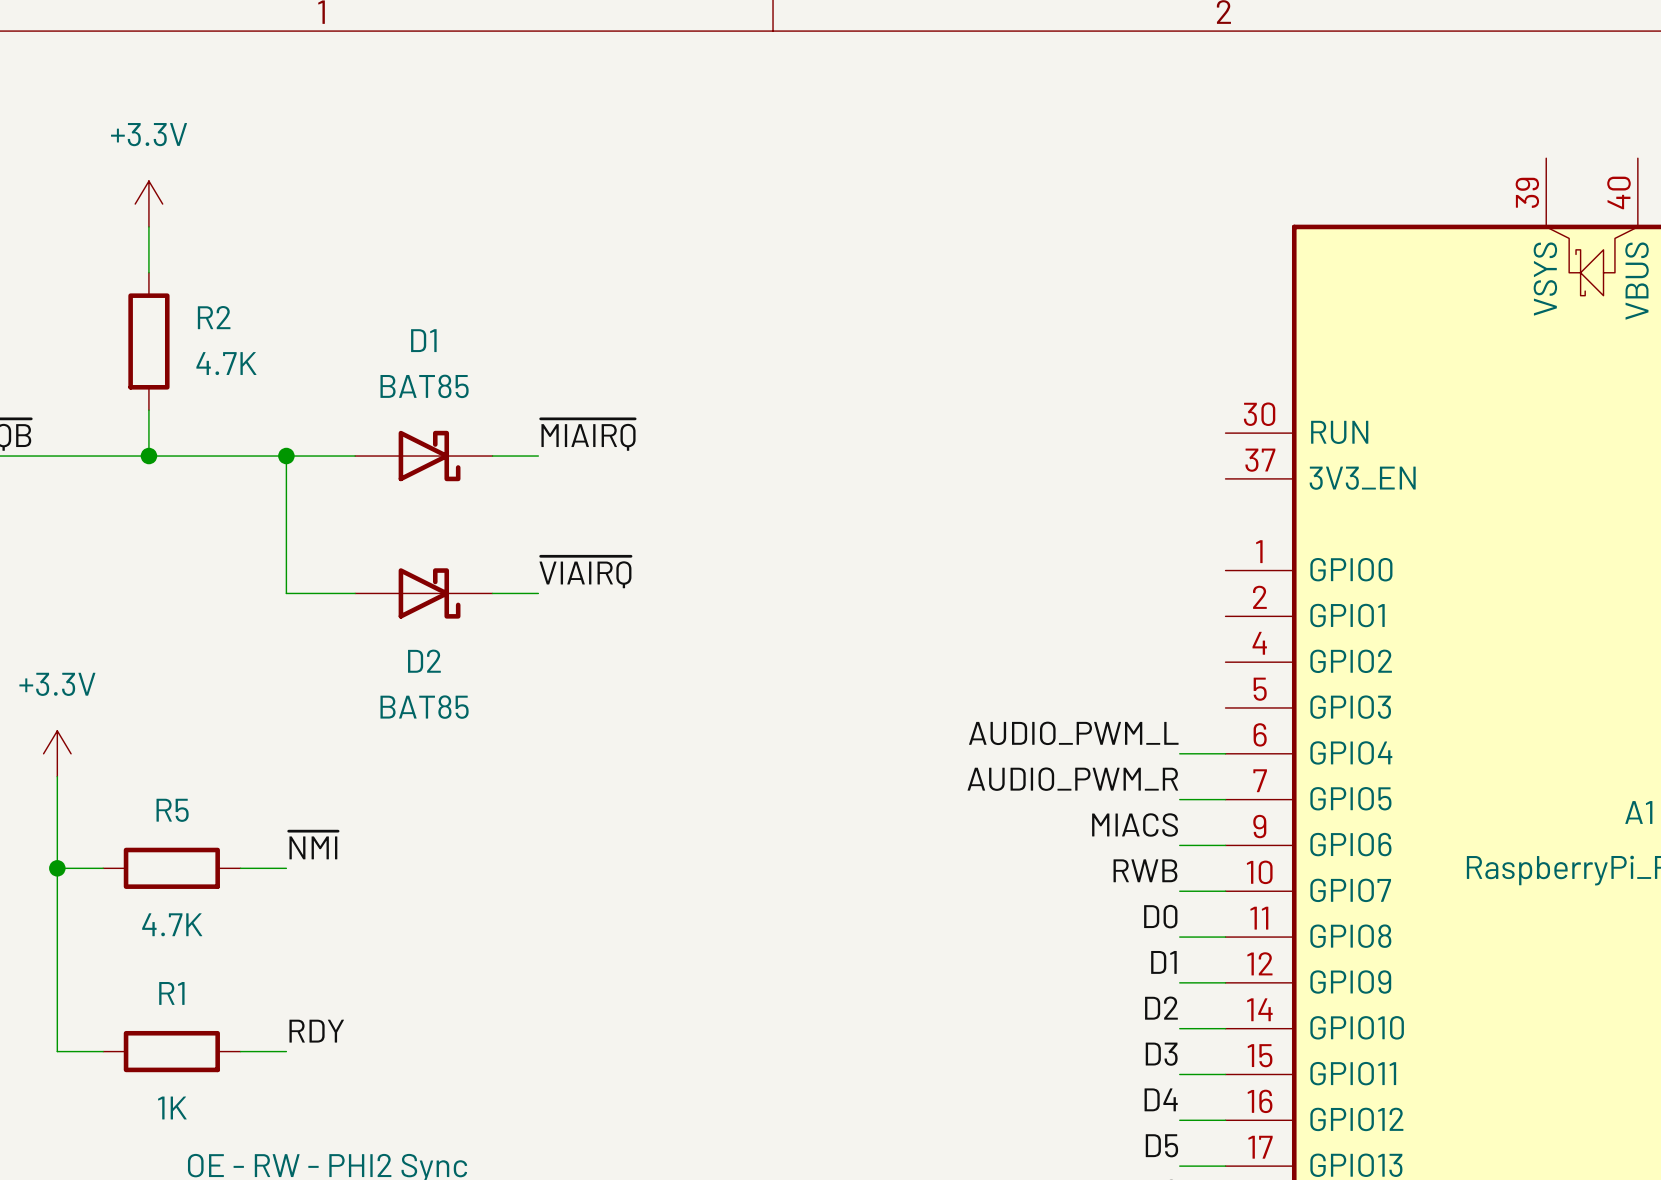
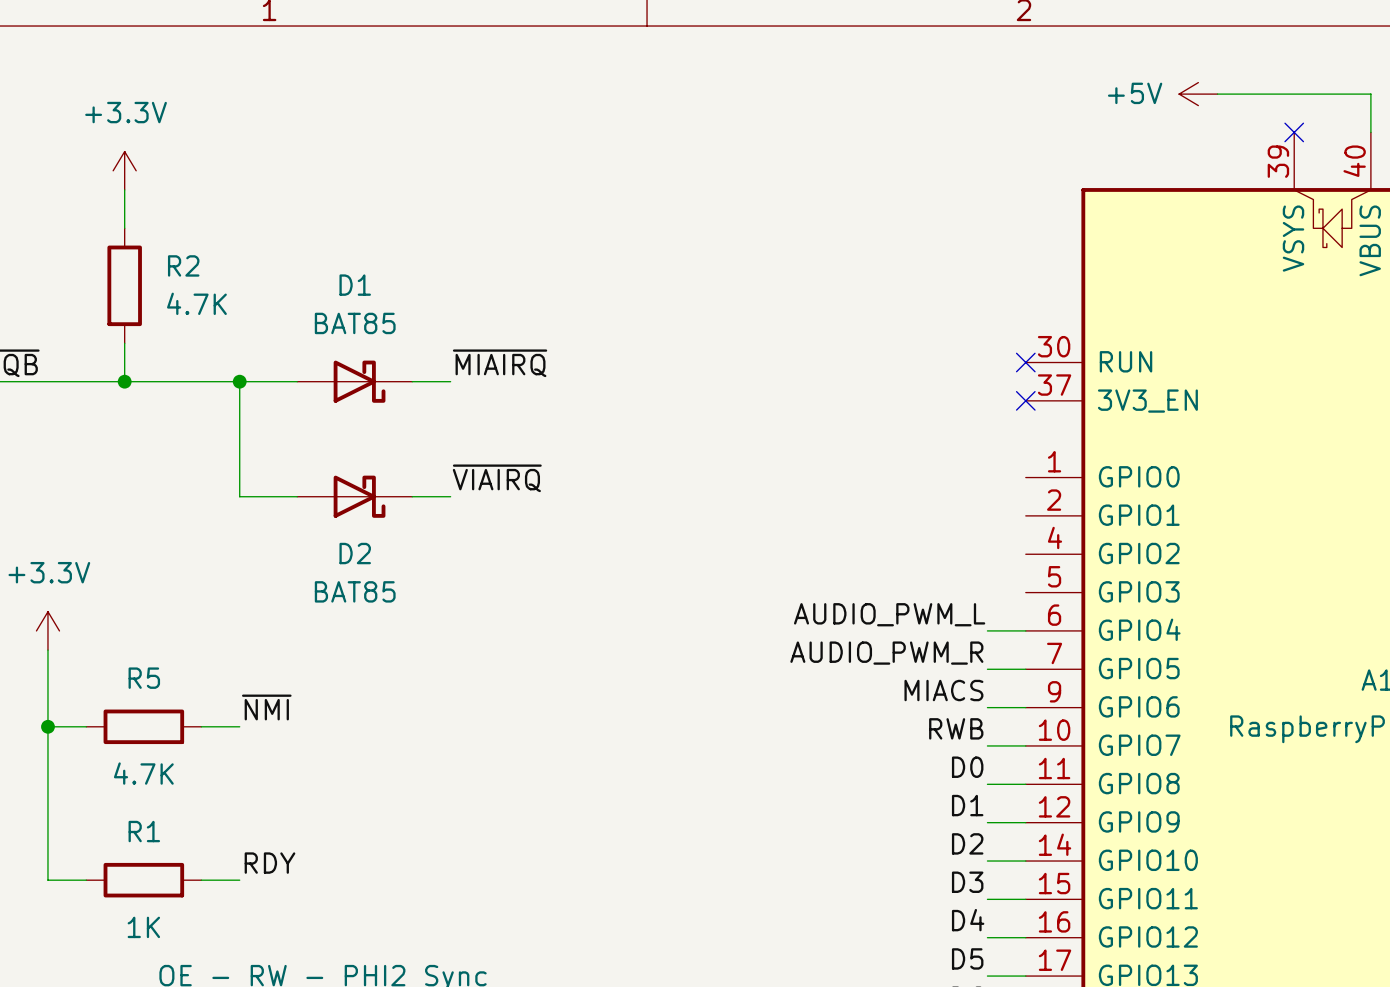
power symbol: none -> +5V (1198, 94)
wire: none -> (1217, 94) (1370, 94) (1370, 132)
no-connect mark: none -> (1294, 132)
no-connect mark: none -> (1025, 362)
no-connect mark: none -> (1025, 400)

